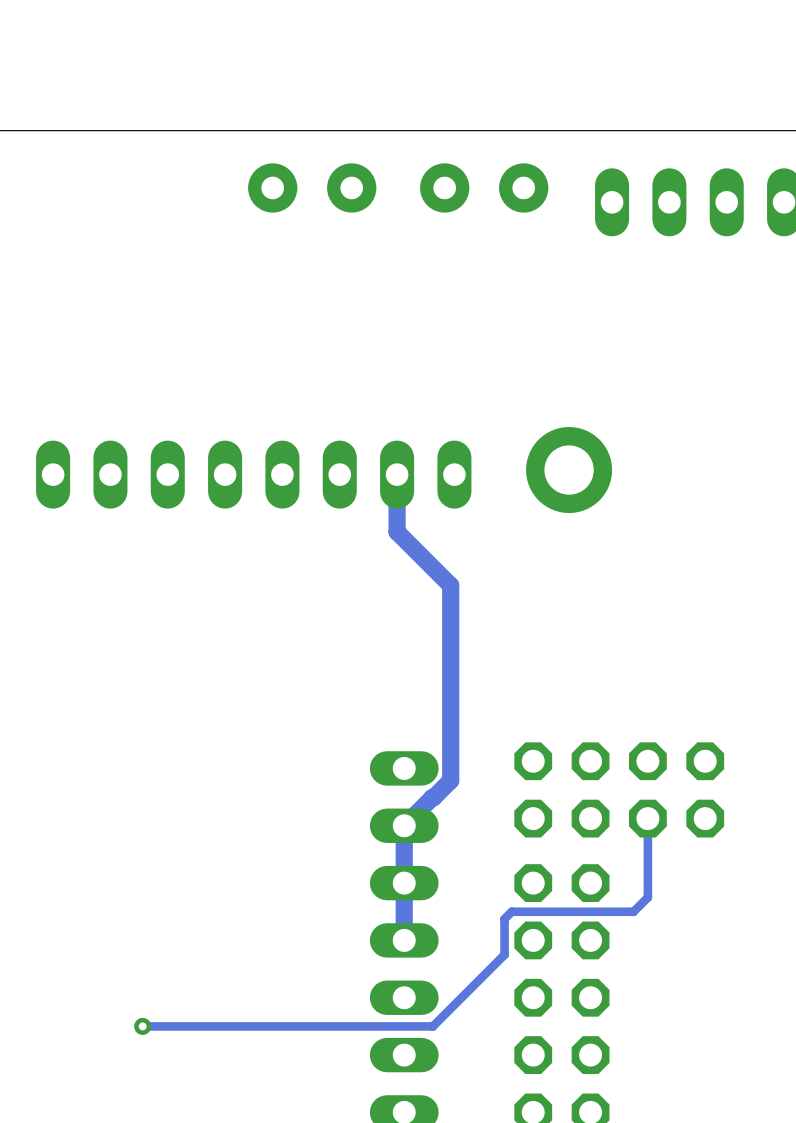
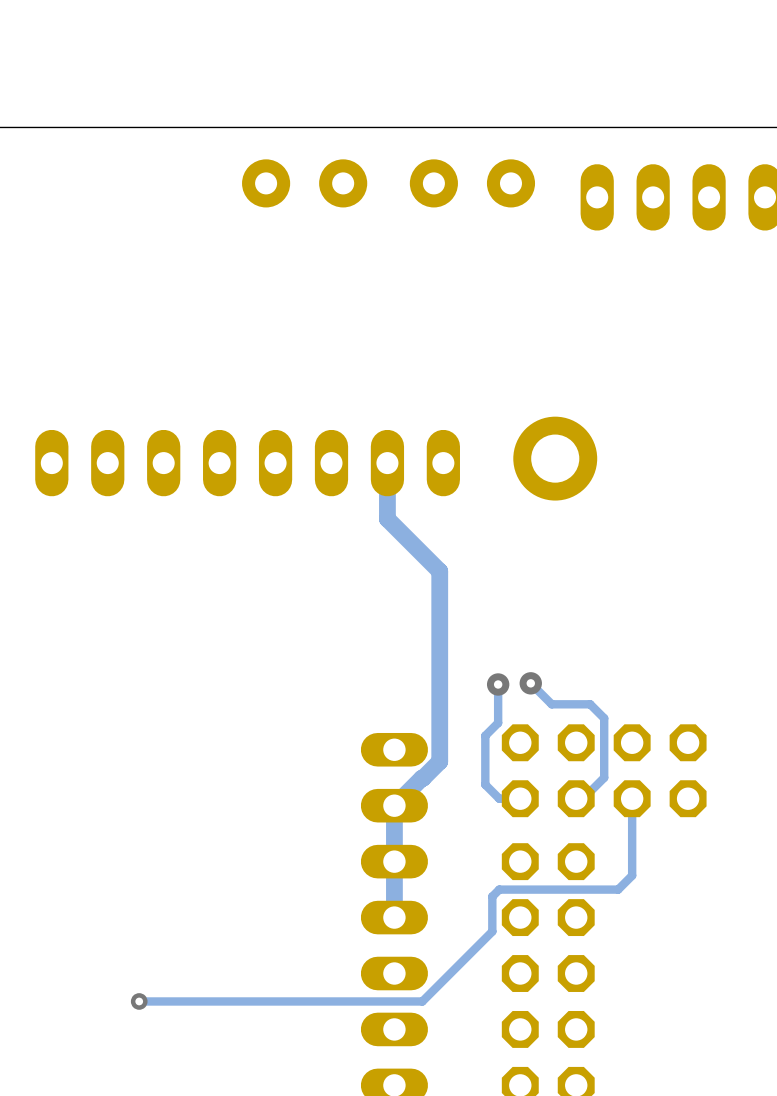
track: none -> (530, 683) (551, 704) (590, 704) (604, 718) (604, 777) (583, 798) (576, 798)
via: none -> (530, 683)
track: none -> (498, 684) (498, 722) (485, 735) (485, 784) (499, 798) (520, 798)
via: none -> (498, 684)

